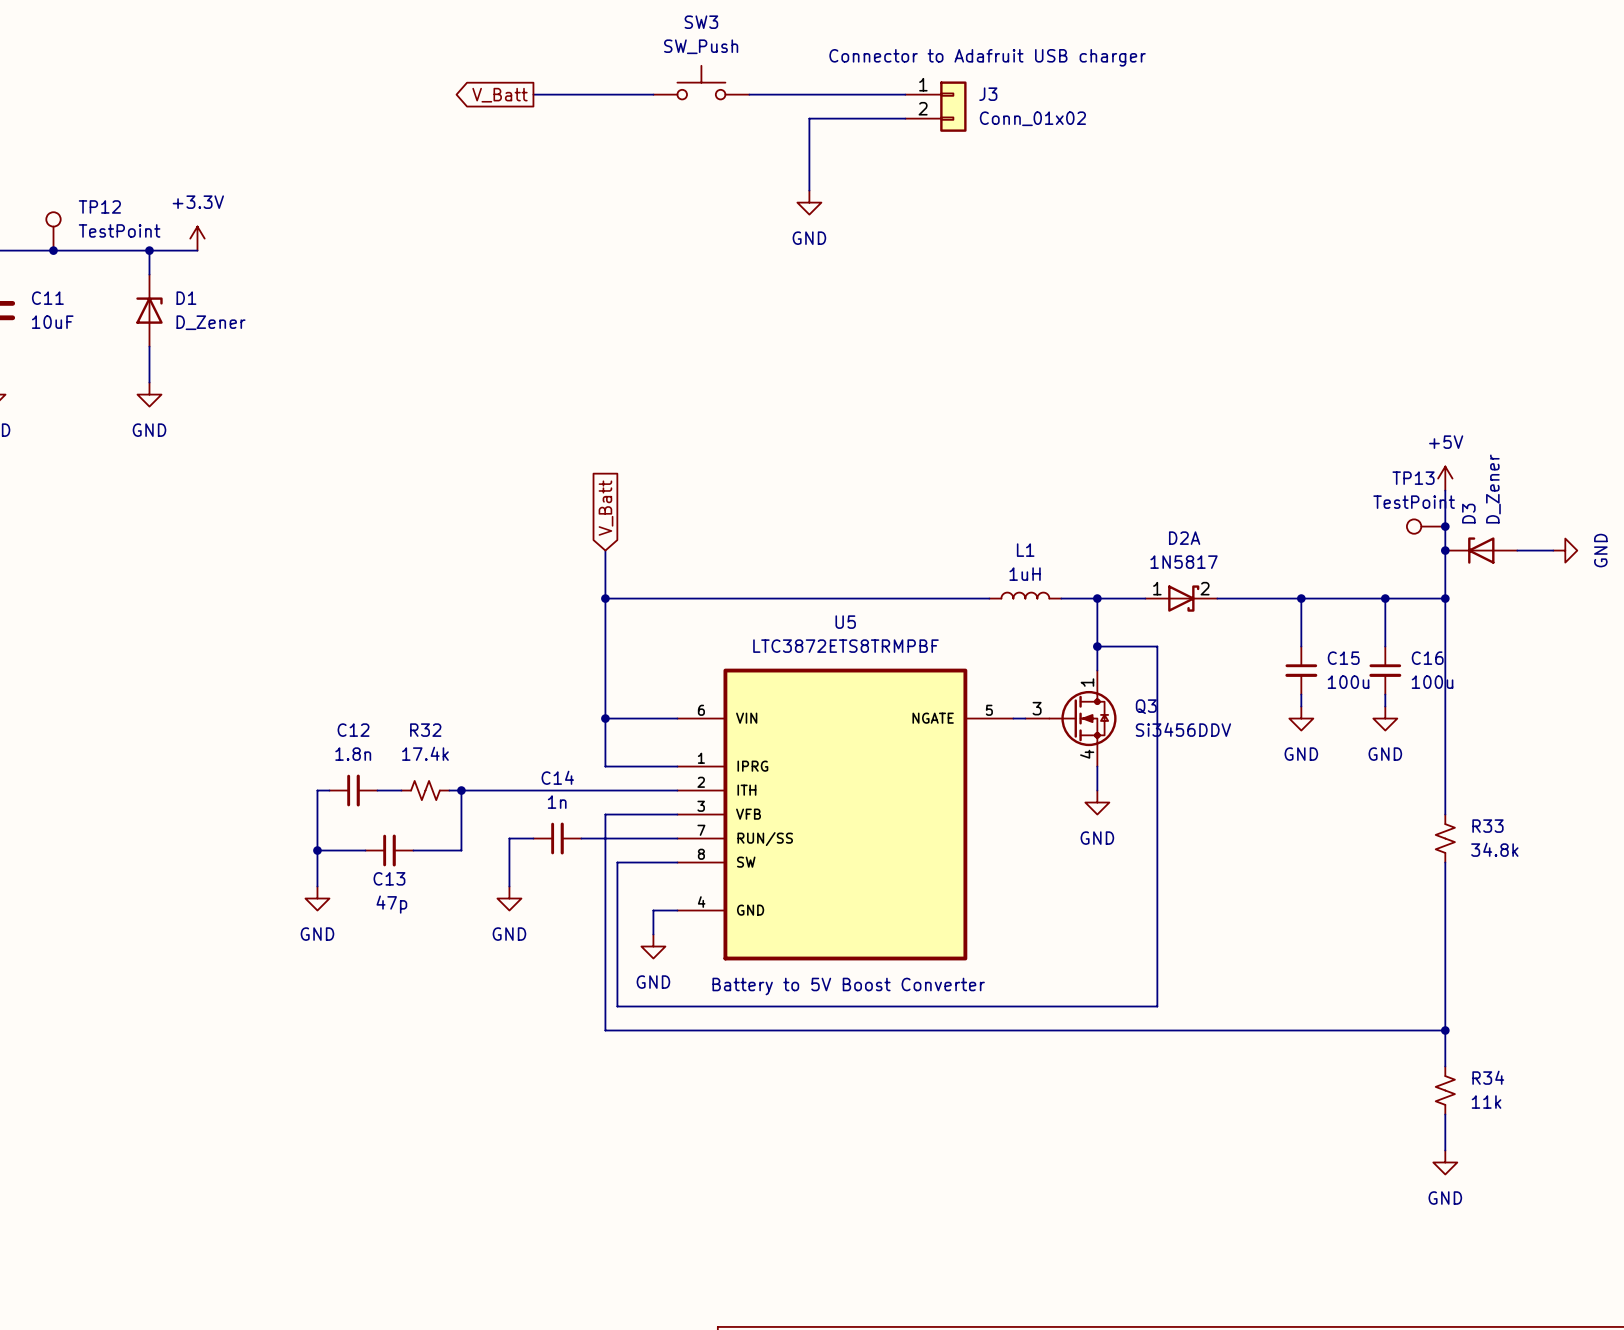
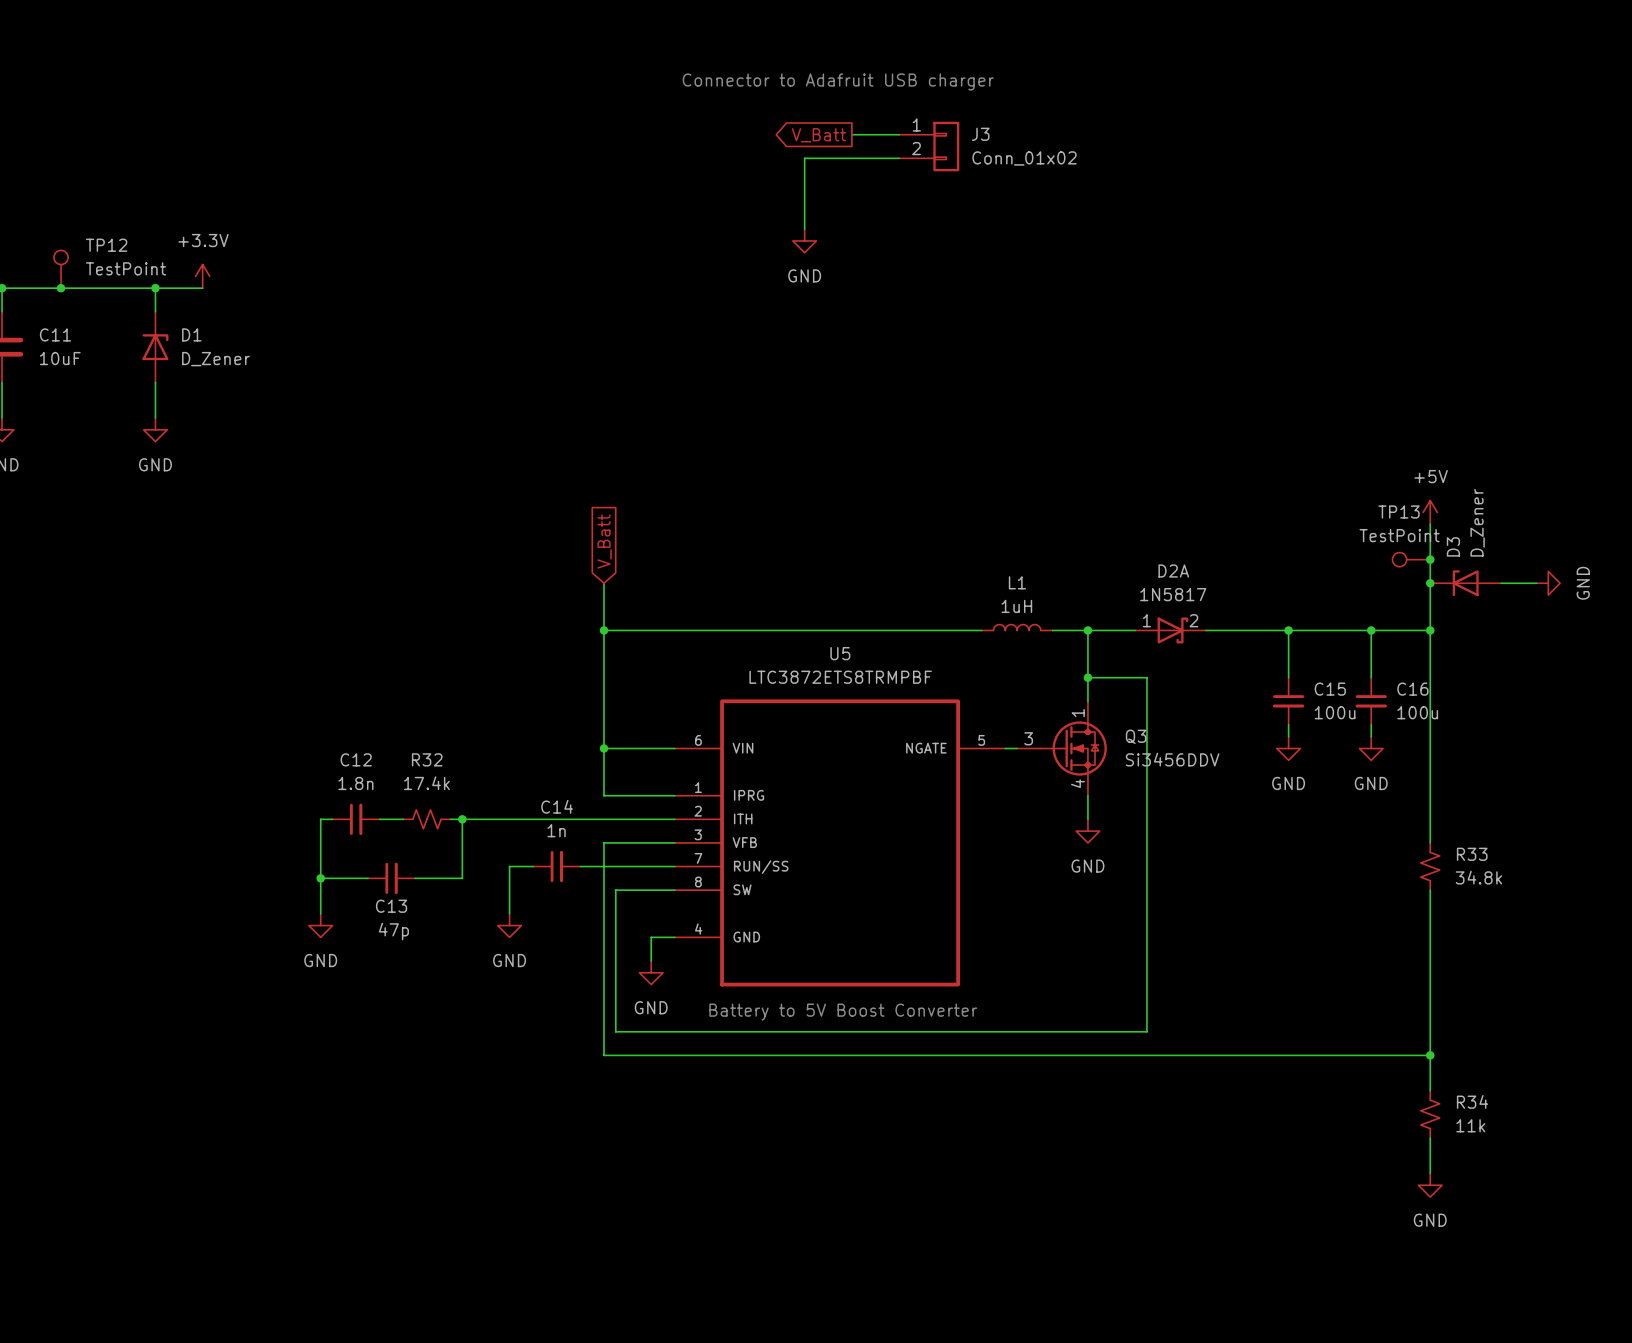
text position: Connector to Adafruit USB charger (987, 57) -> Connector to Adafruit USB charger (838, 81)
SW3: SW_Push (701, 82) -> none
wire: (533, 94) (653, 94) -> none
wire: (749, 94) (857, 94) -> none
global label: V_Batt (499, 95) -> none
global label: none -> V_Batt (818, 135)

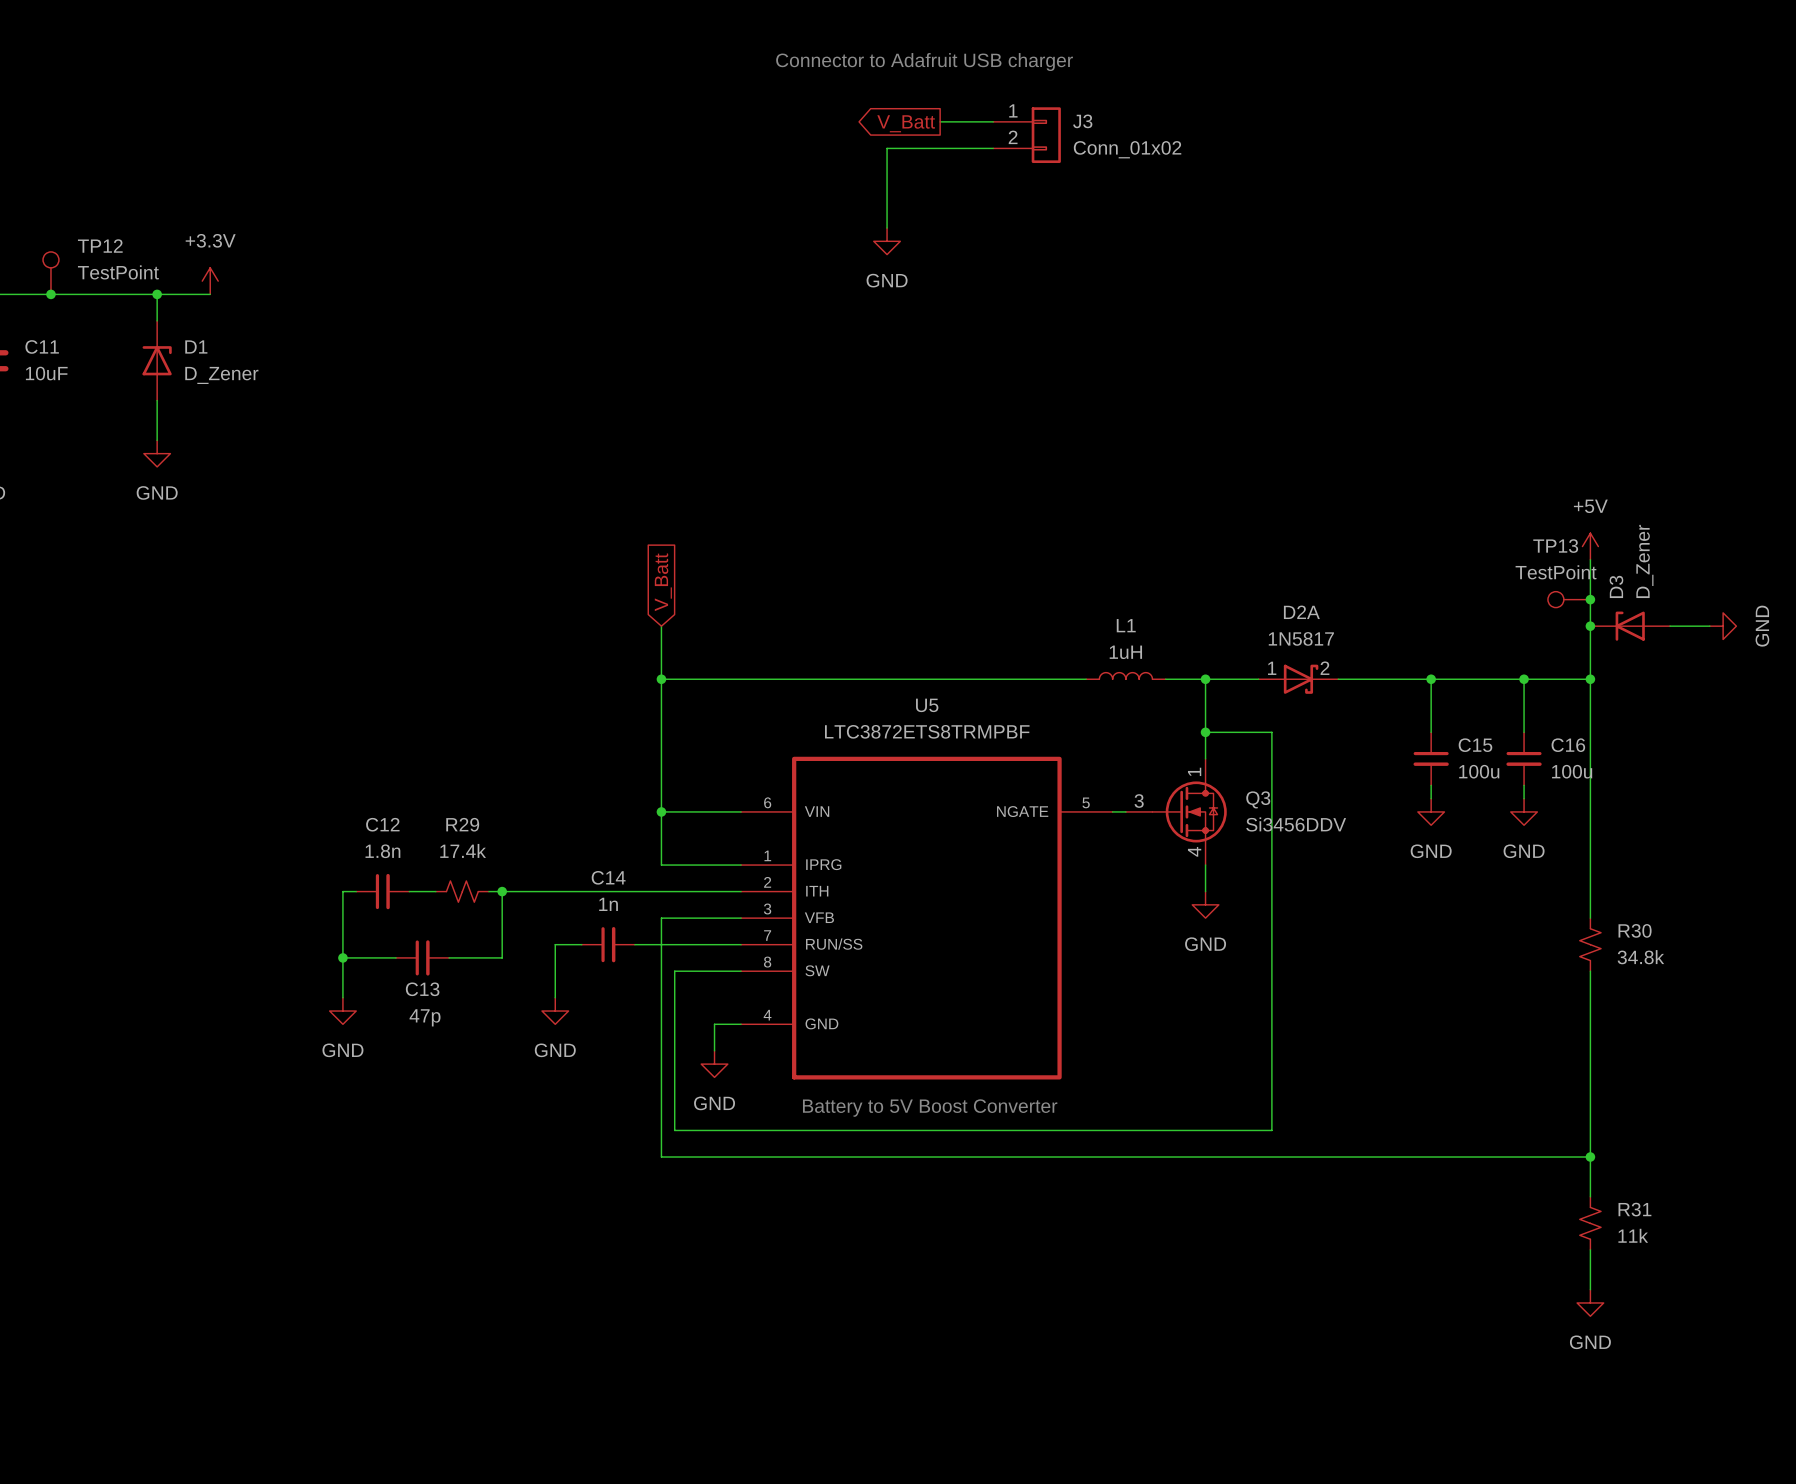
R32 name: R32 (427, 759) -> R29 (462, 824)
R33 name: R33 (1472, 854) -> R30 (1635, 930)
R34 name: R34 (1472, 1101) -> R31 (1634, 1209)

